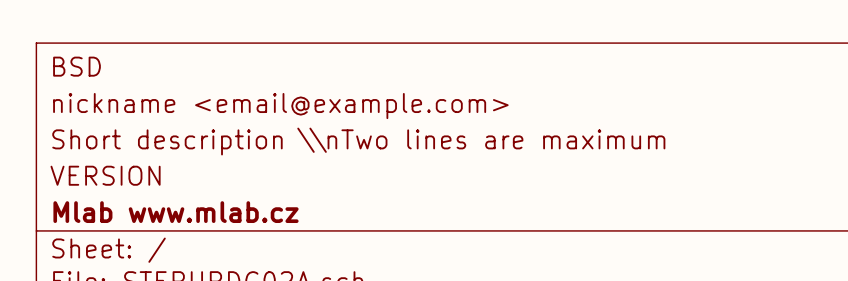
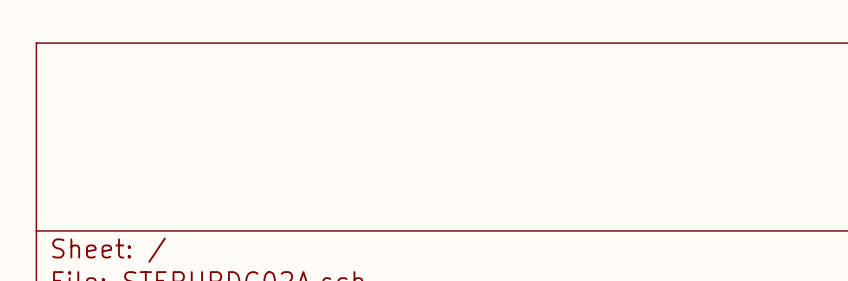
title block: BSD (76, 66) -> none
title block: nickname <email@example.com> (280, 106) -> none
title block: Short description \\nTwo lines are maximum (358, 141) -> none
title block: VERSION (105, 175) -> none
title block: Mlab www.mlab.cz (176, 212) -> none

